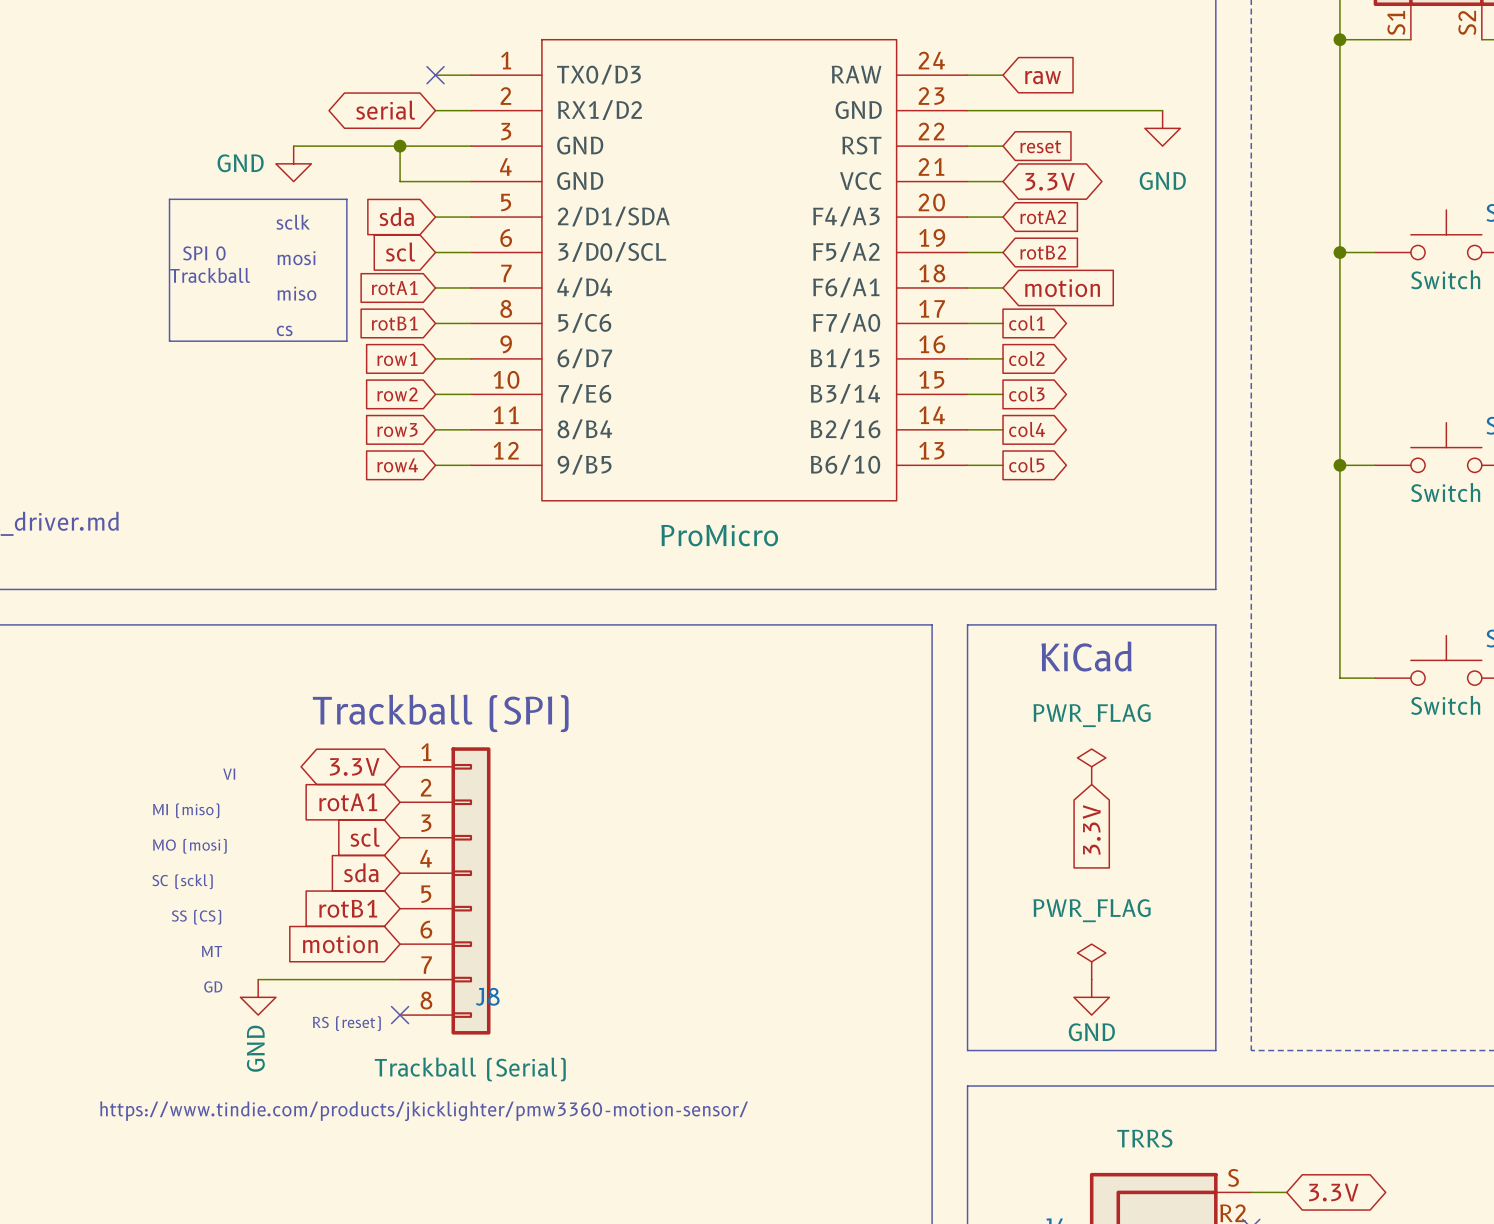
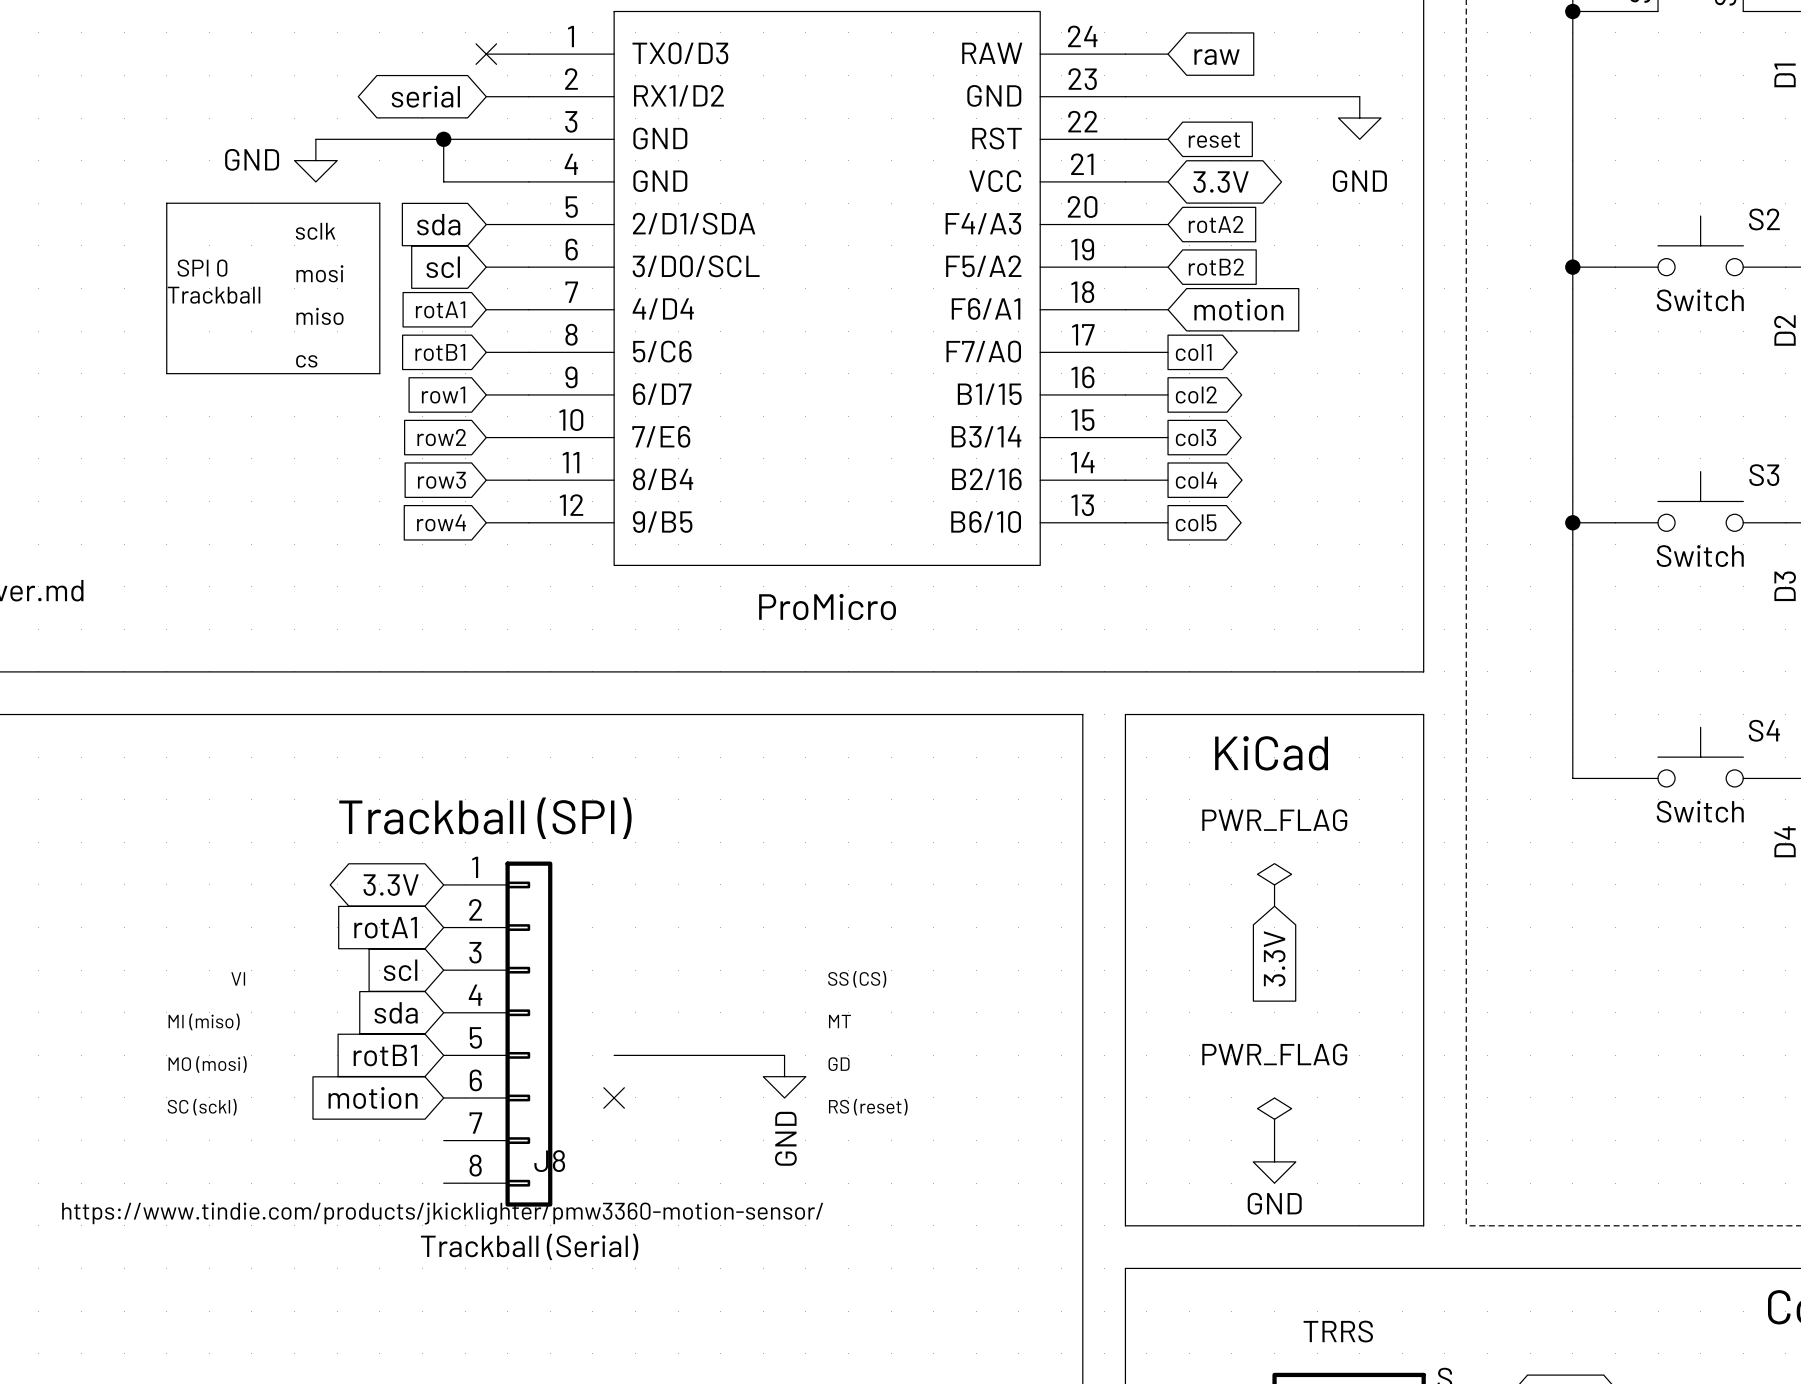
text position: VI (229, 774) -> VI (238, 978)
text position: MI (miso) (186, 810) -> MI (miso) (204, 1021)
text position: MO (mosi) (189, 846) -> MO (mosi) (207, 1064)
text: none -> SS (CS) (857, 979)
text: none -> MT (839, 1021)
text position: SC (sckl) (182, 881) -> SC (sckl) (202, 1107)
text: none -> GD (839, 1064)
text: SS (CS) (196, 917) -> none
power symbol: none -> GND (784, 1076)
no-connect mark: none -> (614, 1097)
text: MT (212, 951) -> none
wire: (258, 979) (400, 979) -> (614, 1055) (784, 1055)
text: GD (213, 986) -> none
power symbol: GND (258, 997) -> none
no-connect mark: (400, 1015) -> none
text position: RS (reset) (346, 1023) -> RS (reset) (868, 1107)
text position: https://www.tindie.com/products/jkicklighter/pmw3360-motion-sensor/ (424, 1111) -> https://www.tindie.com/products/jkicklighter/pmw3360-motion-sensor/ (442, 1213)

